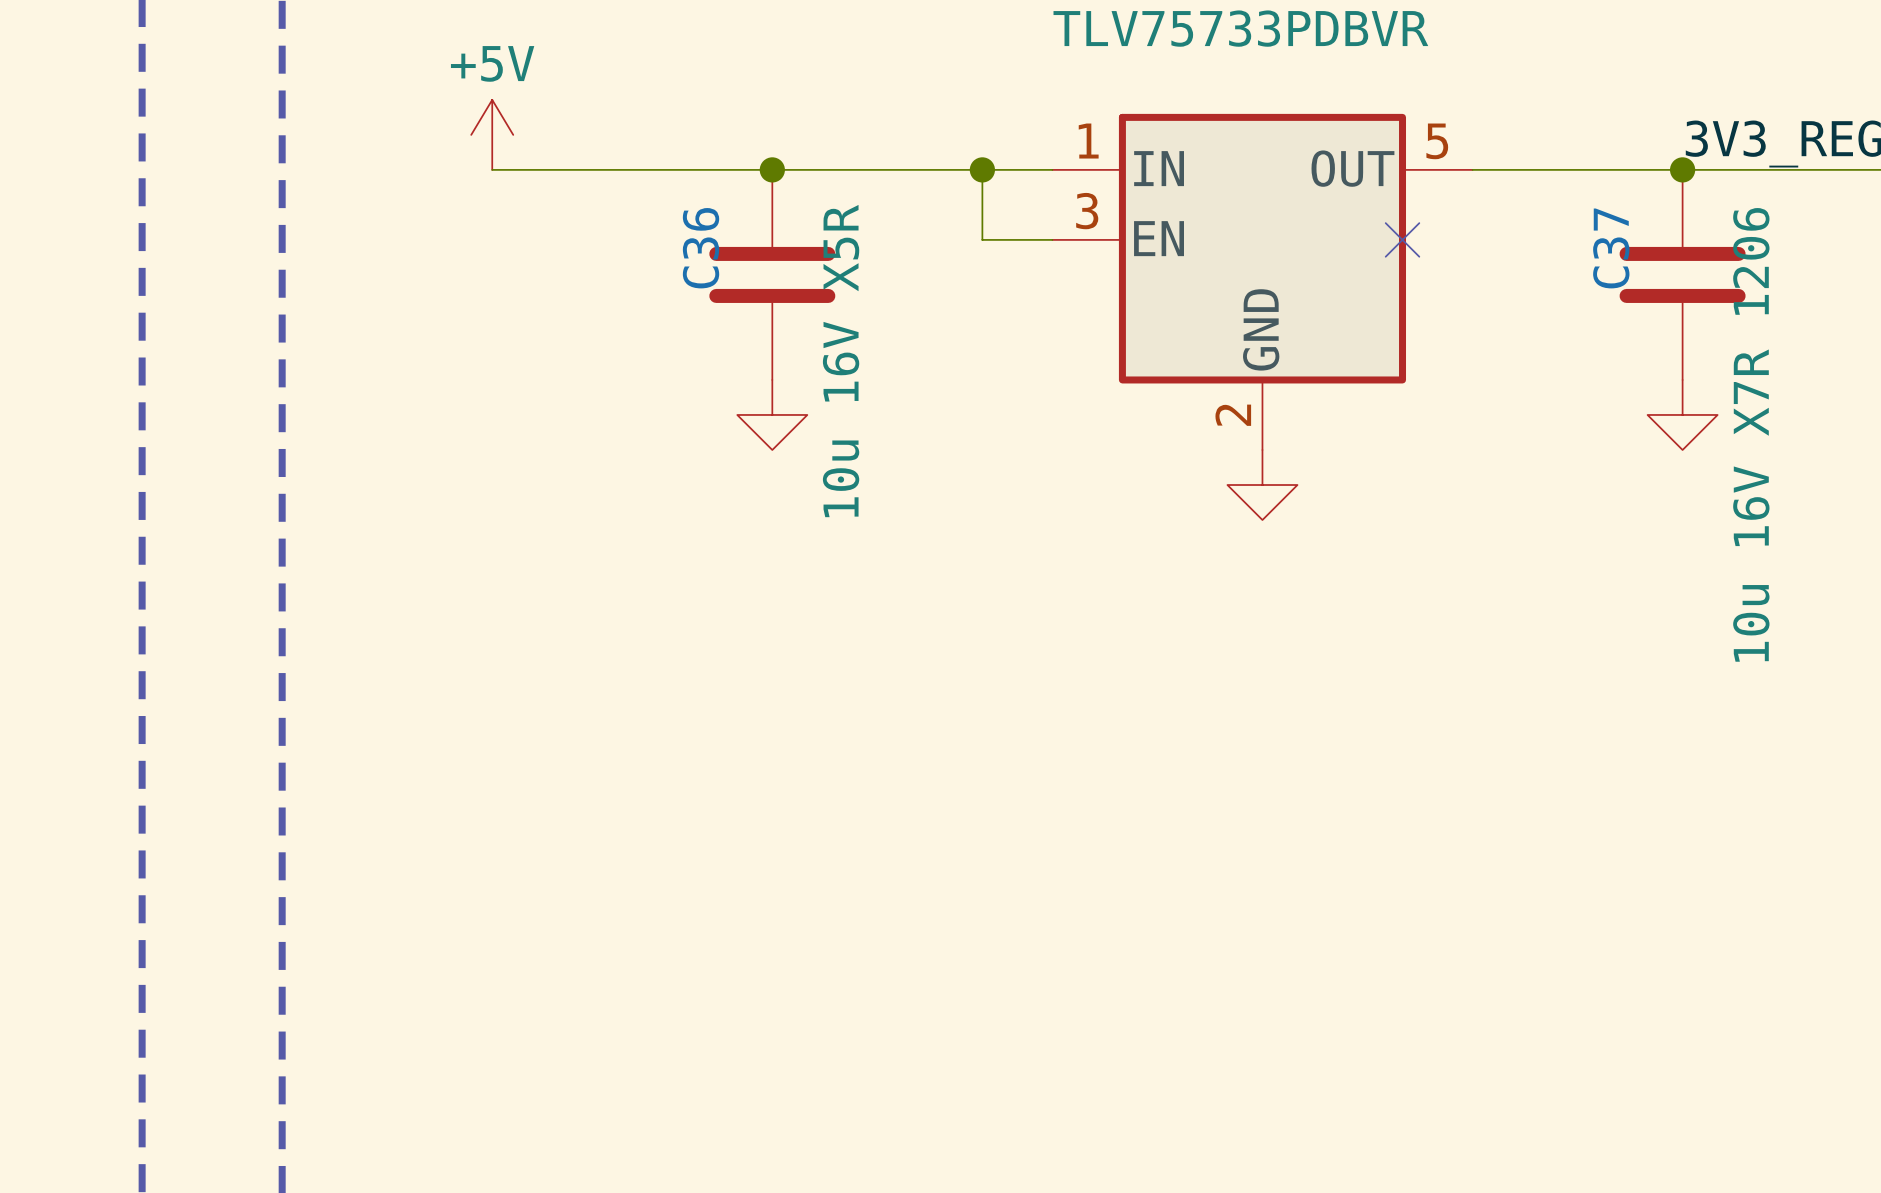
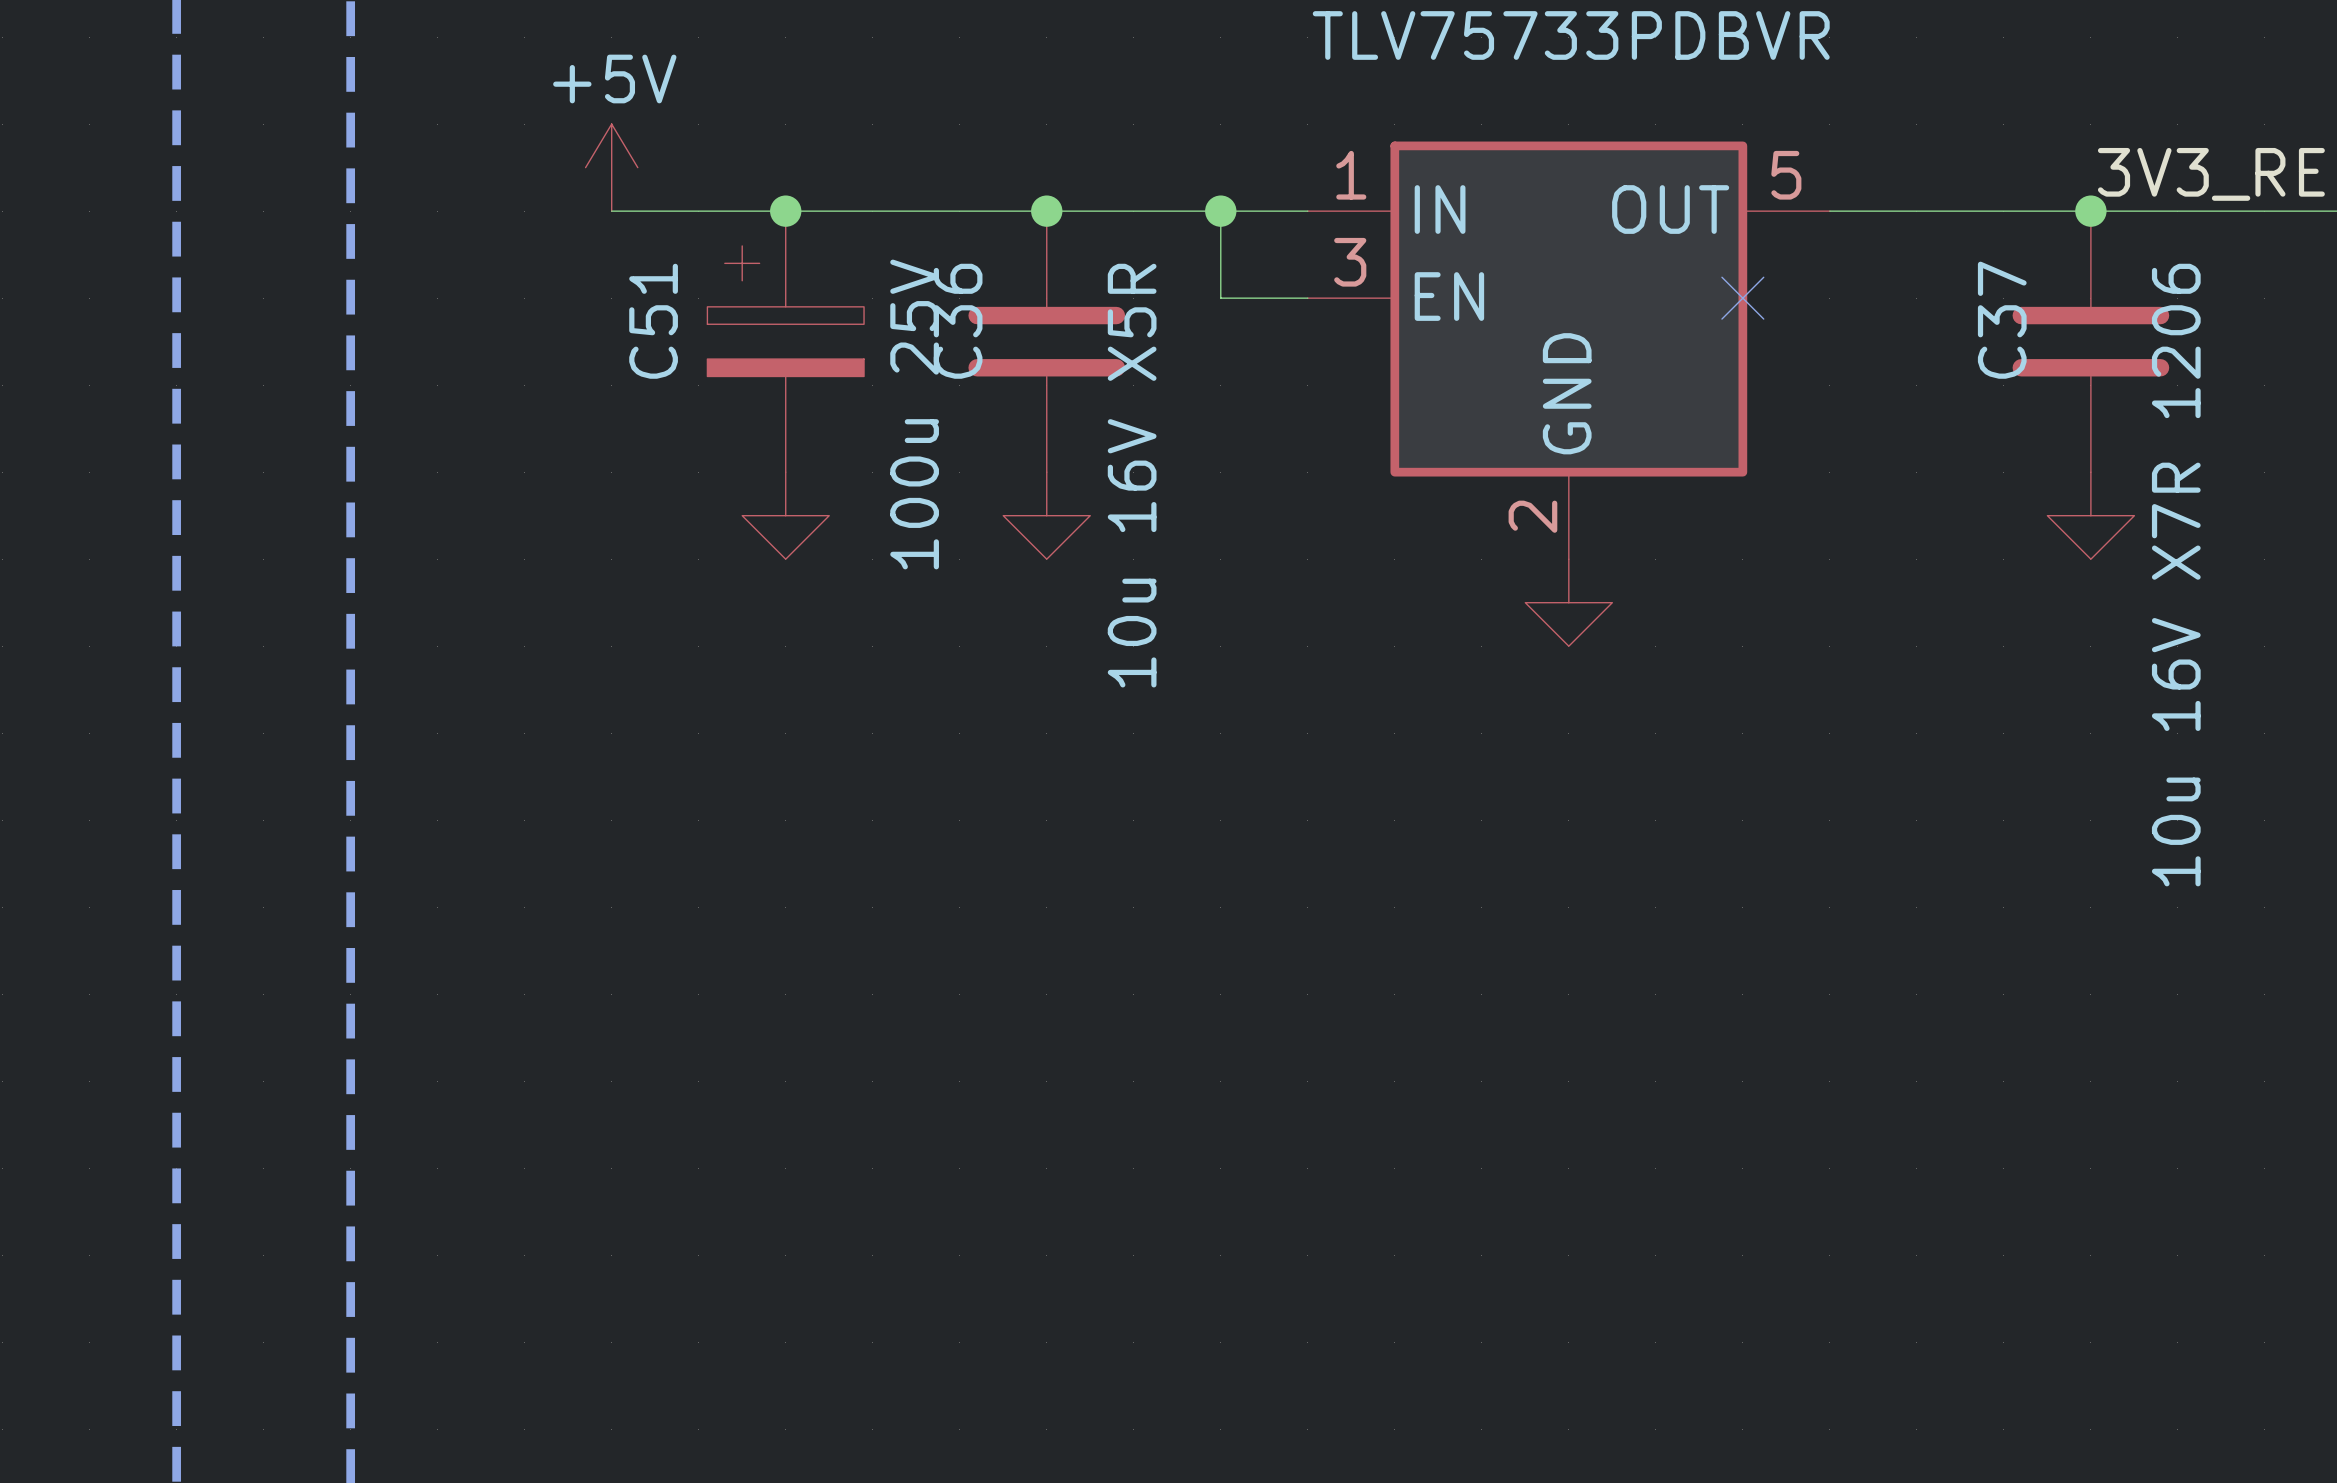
junction: none -> (785, 211)
junction: (772, 169) -> none
junction: none -> (1046, 211)
C51: none -> 100u 25V (785, 341)
C36 position: (772, 274) -> (1046, 341)
power symbol: none -> (785, 515)
power symbol: (772, 414) -> none
power symbol: none -> (1046, 515)

